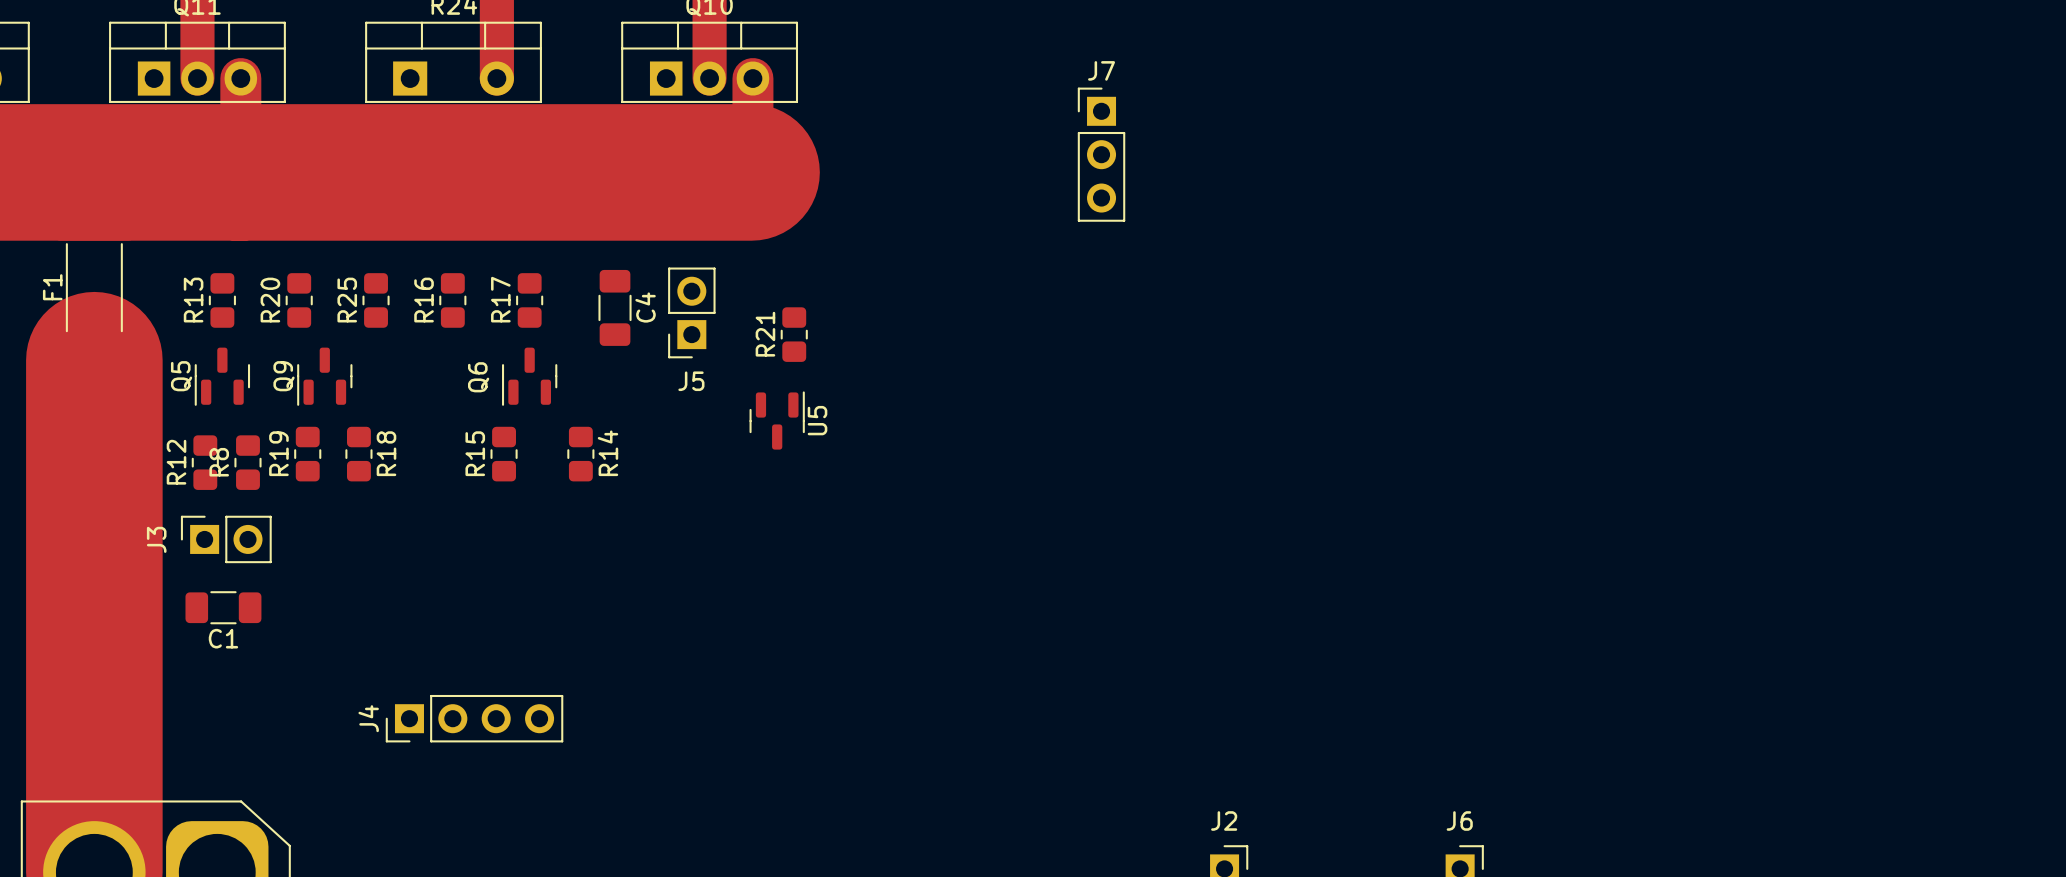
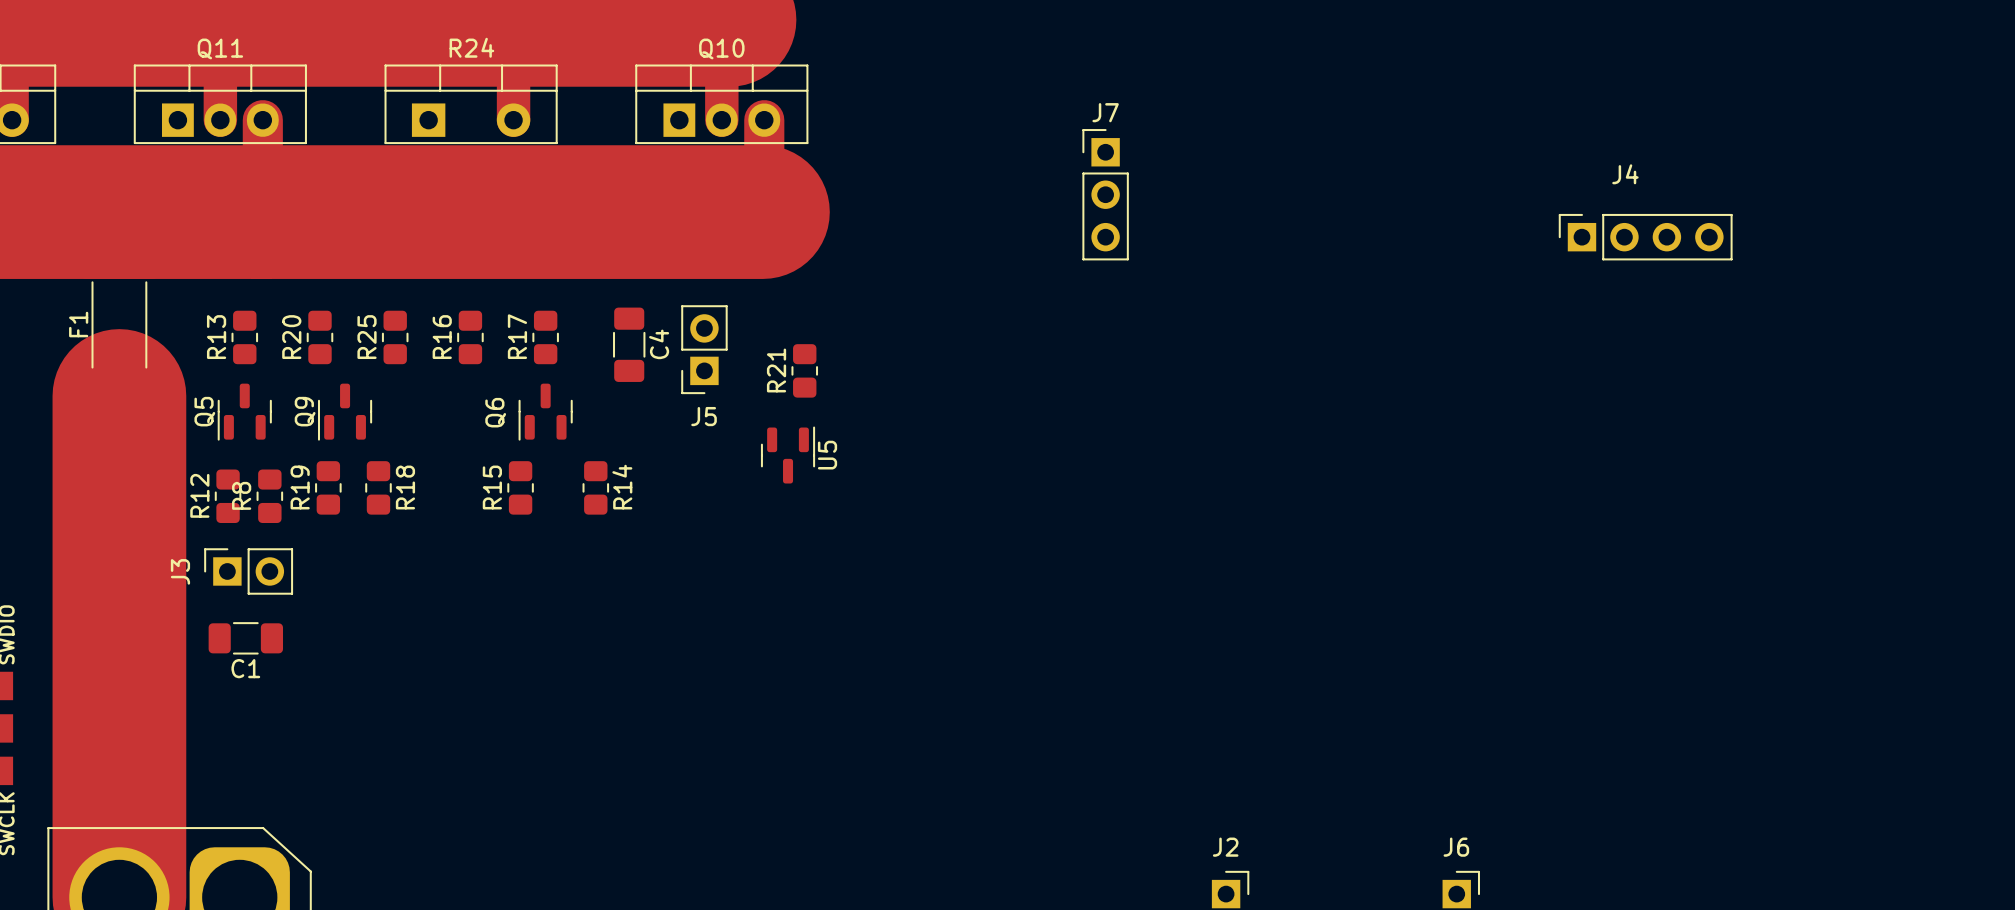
J4 footprint: [385, 694, 564, 743] -> [1558, 213, 1733, 261]
J4 name position: J4 (368, 718) -> J4 (1625, 174)

